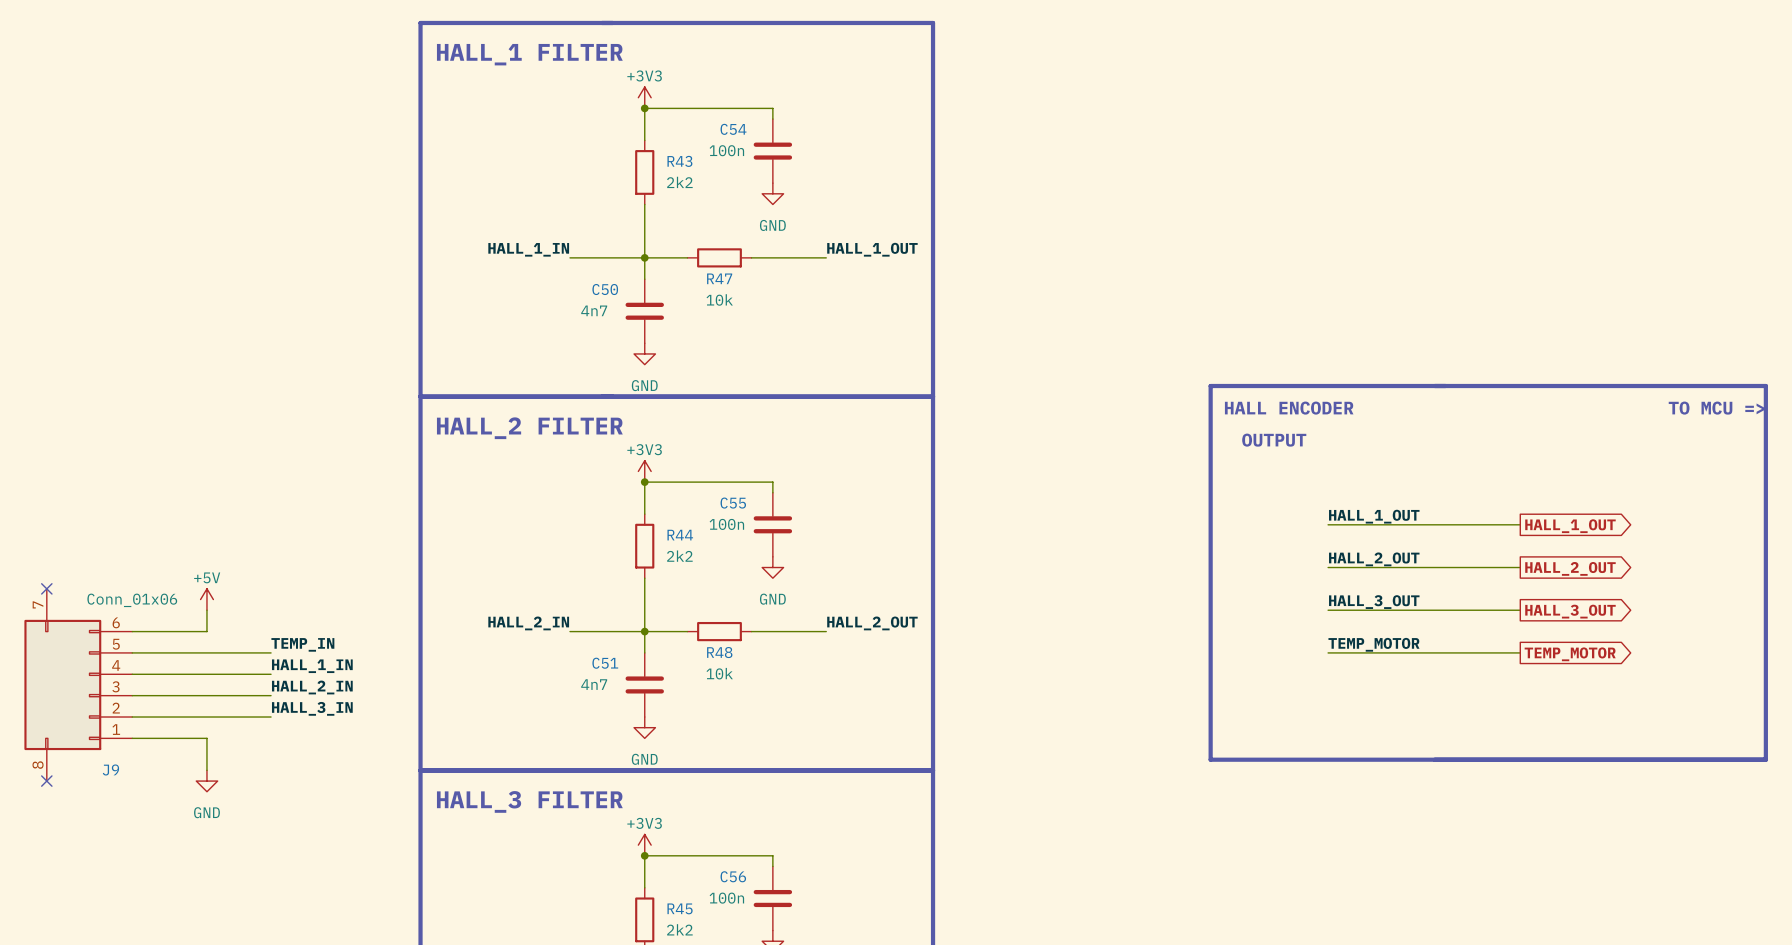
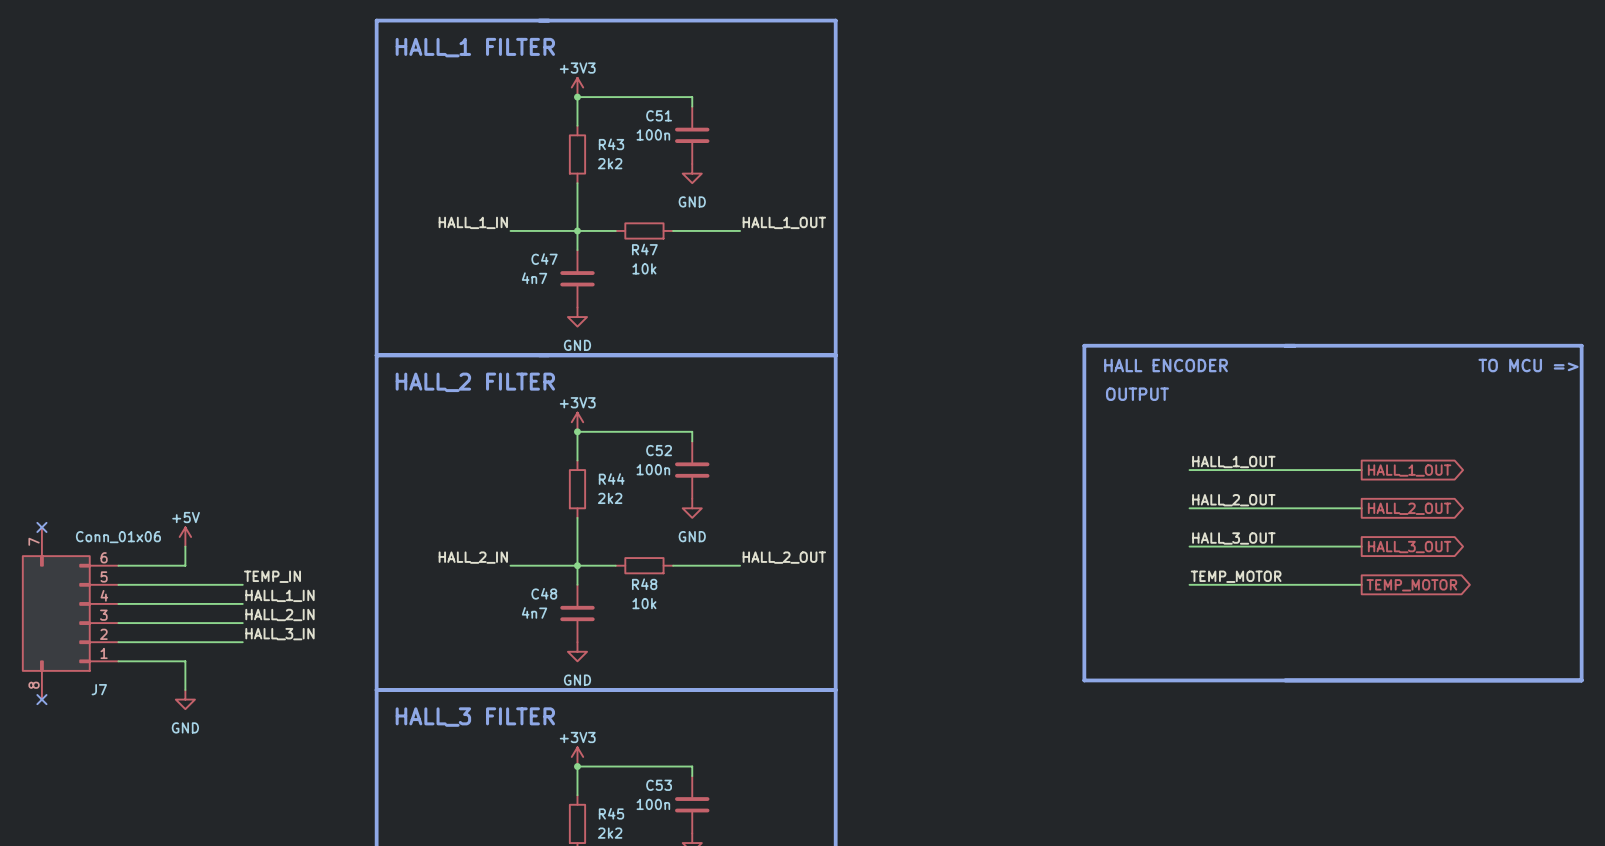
C54 name: C54 (733, 129) -> C51 (659, 115)
C50 name: C50 (605, 289) -> C47 (544, 259)
C55 name: C55 (733, 503) -> C52 (659, 450)
C51 name: C51 (605, 663) -> C48 (544, 593)
J9 name: J9 (110, 769) -> J7 (99, 689)
C56 name: C56 (733, 876) -> C53 (659, 785)

